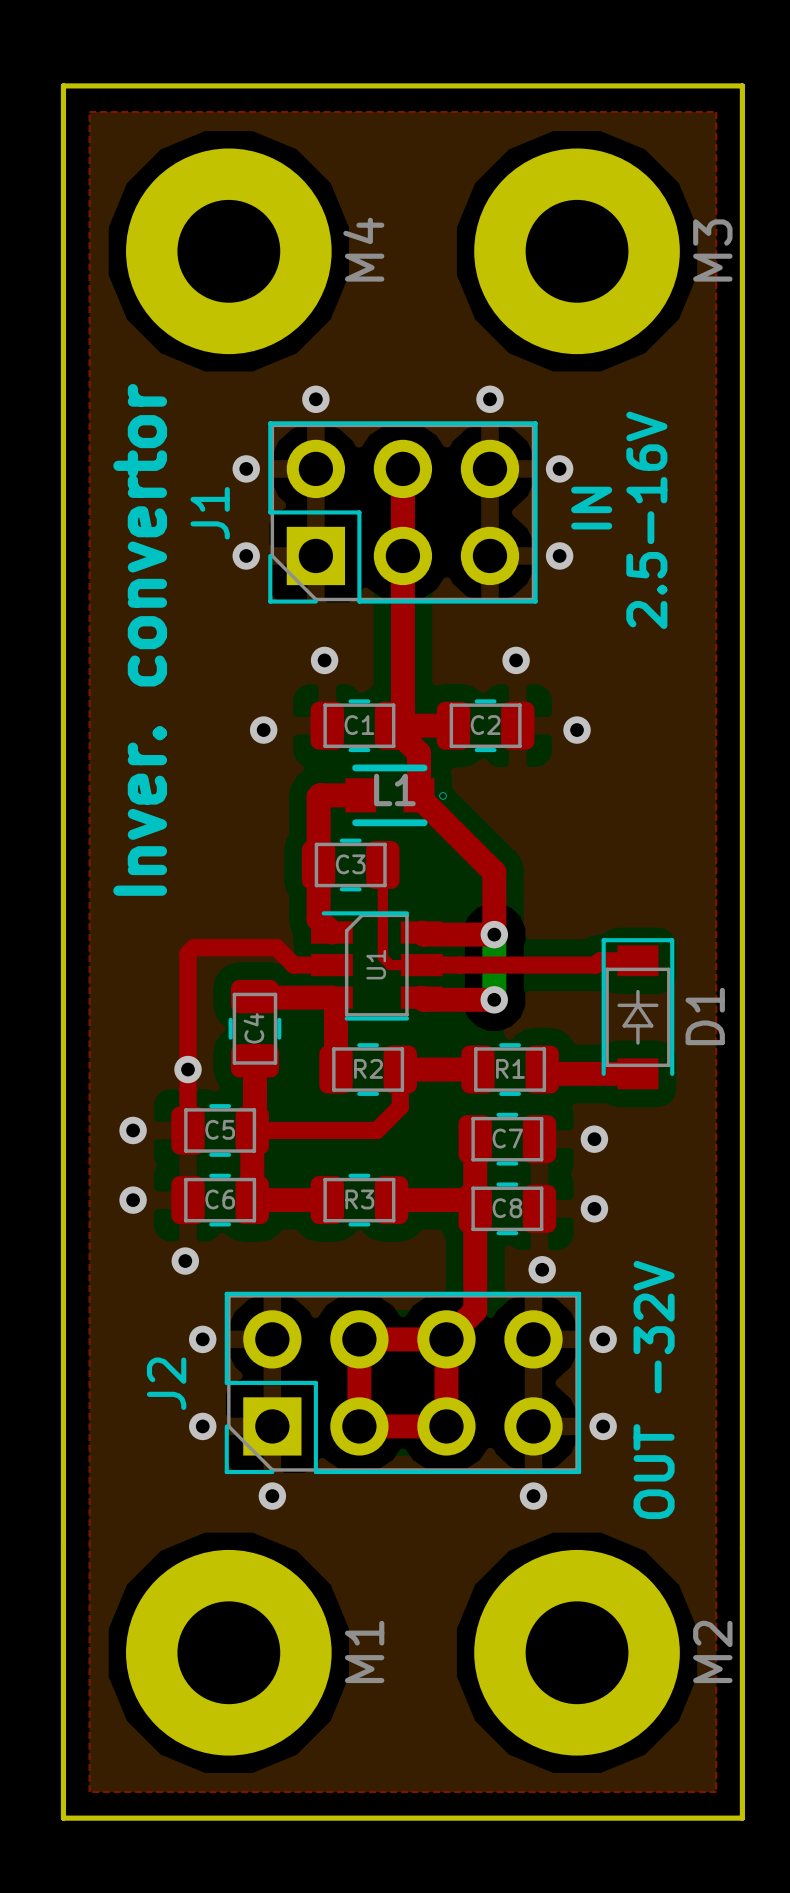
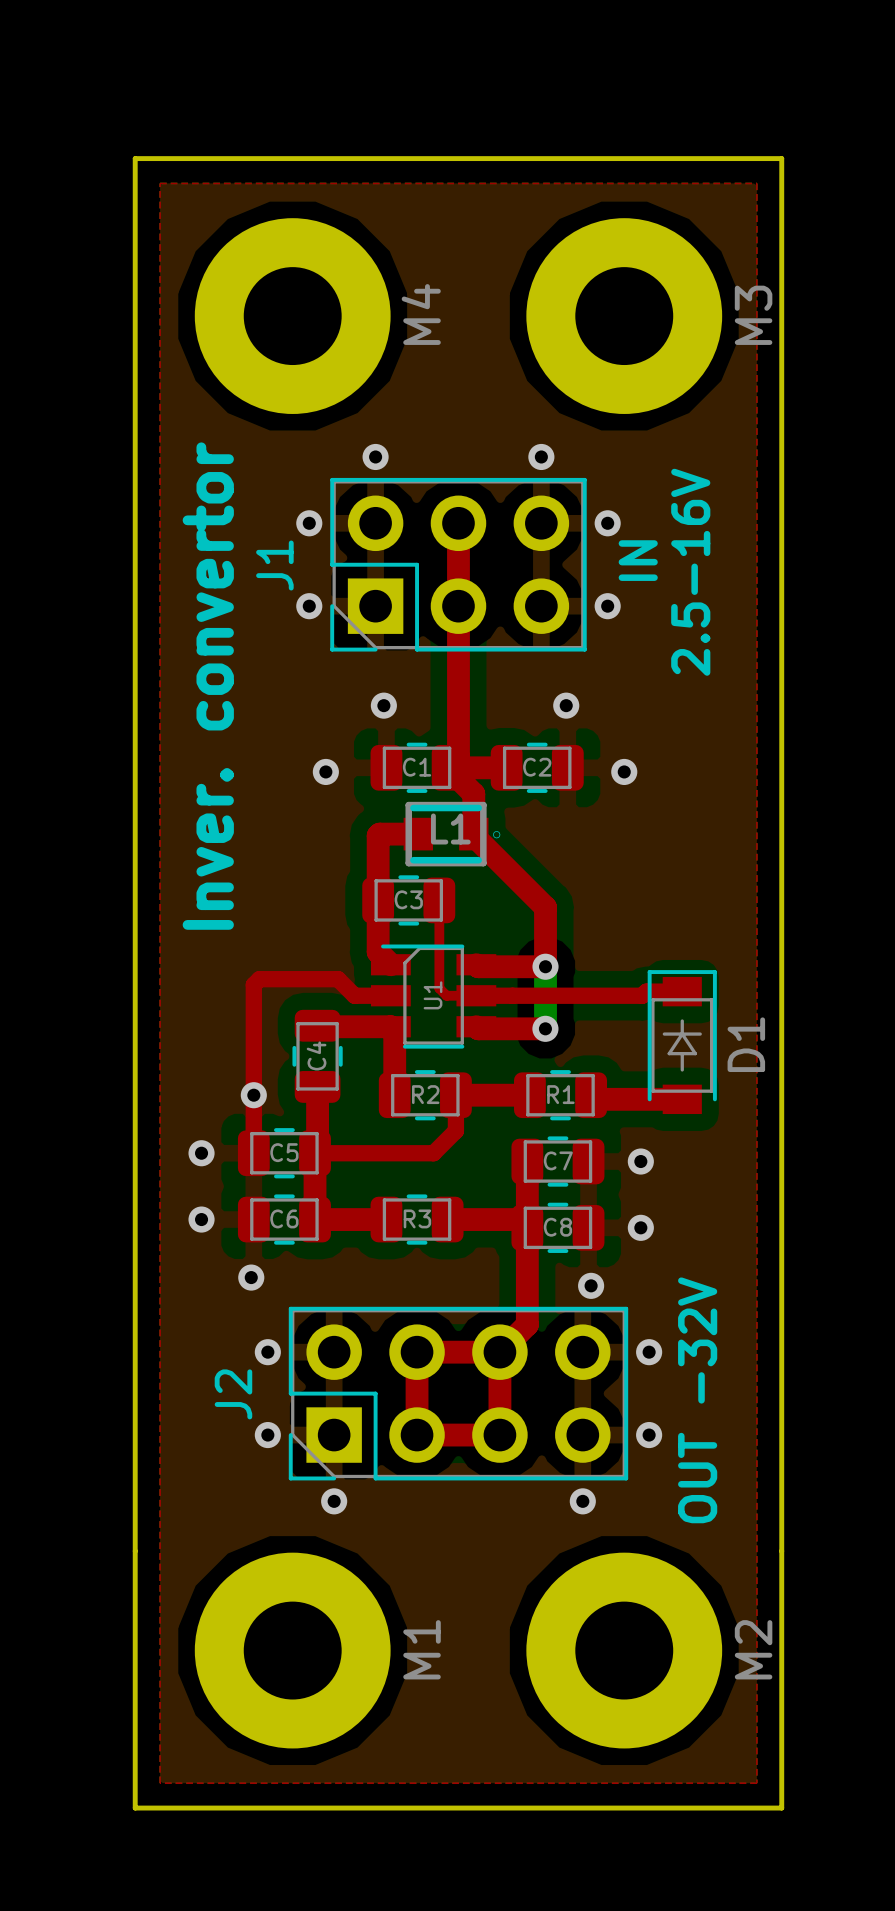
line: none -> (408, 805) (408, 863) (483, 863) (483, 805) (408, 805)

